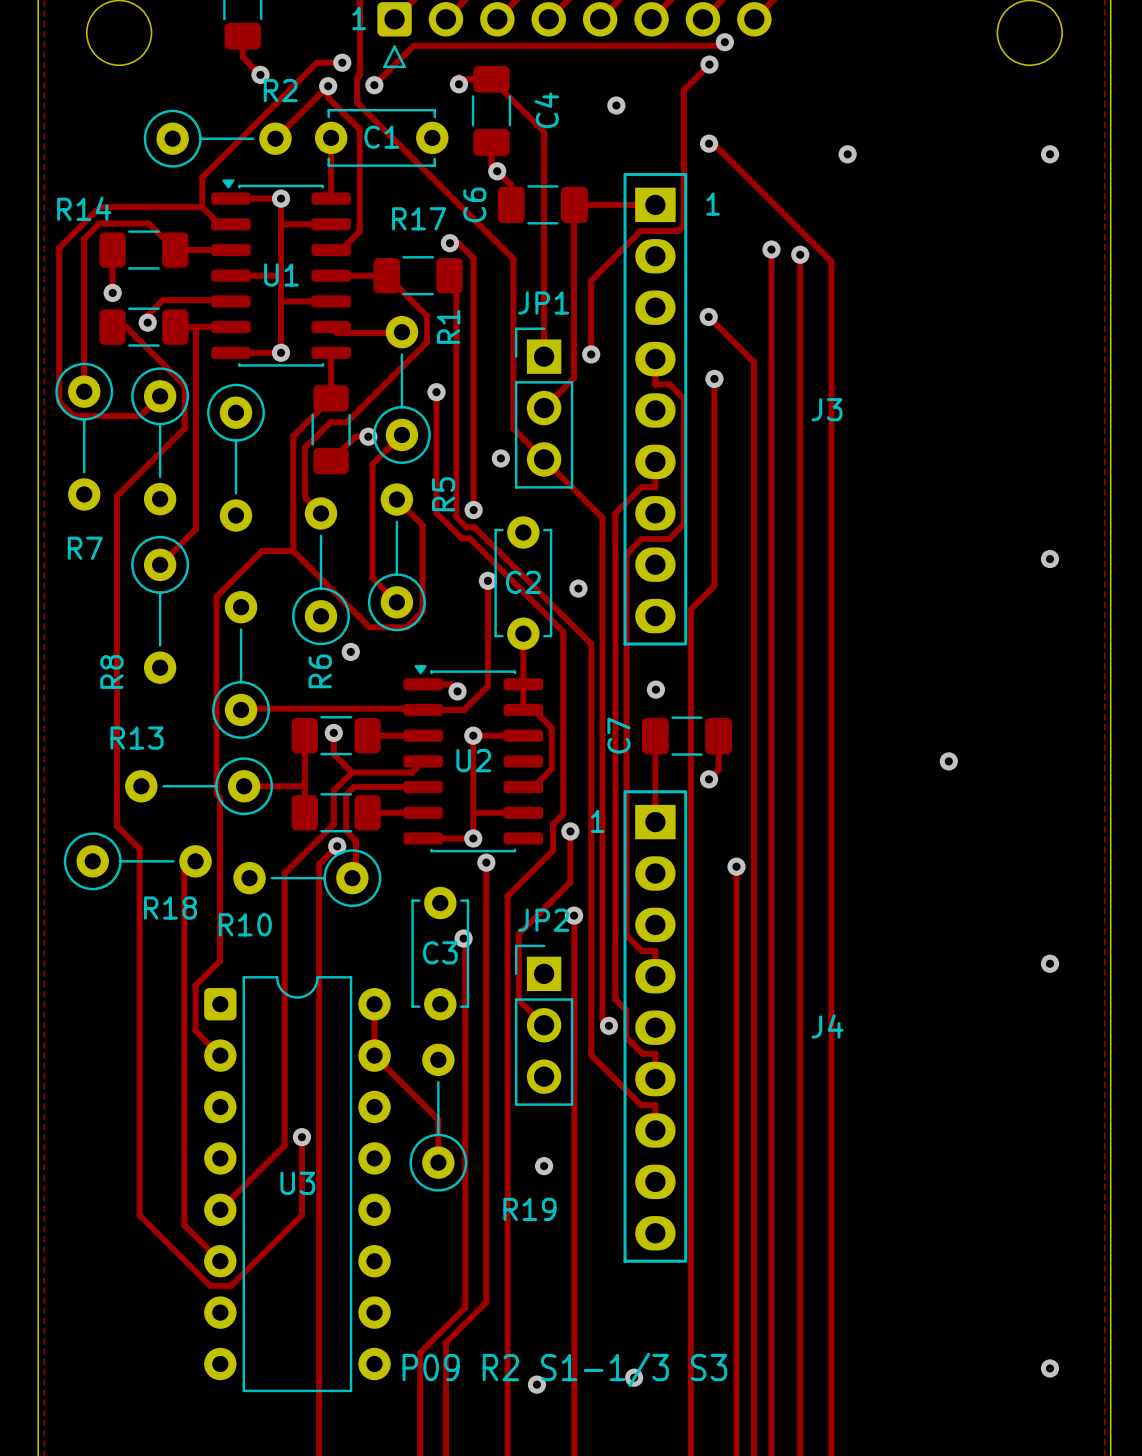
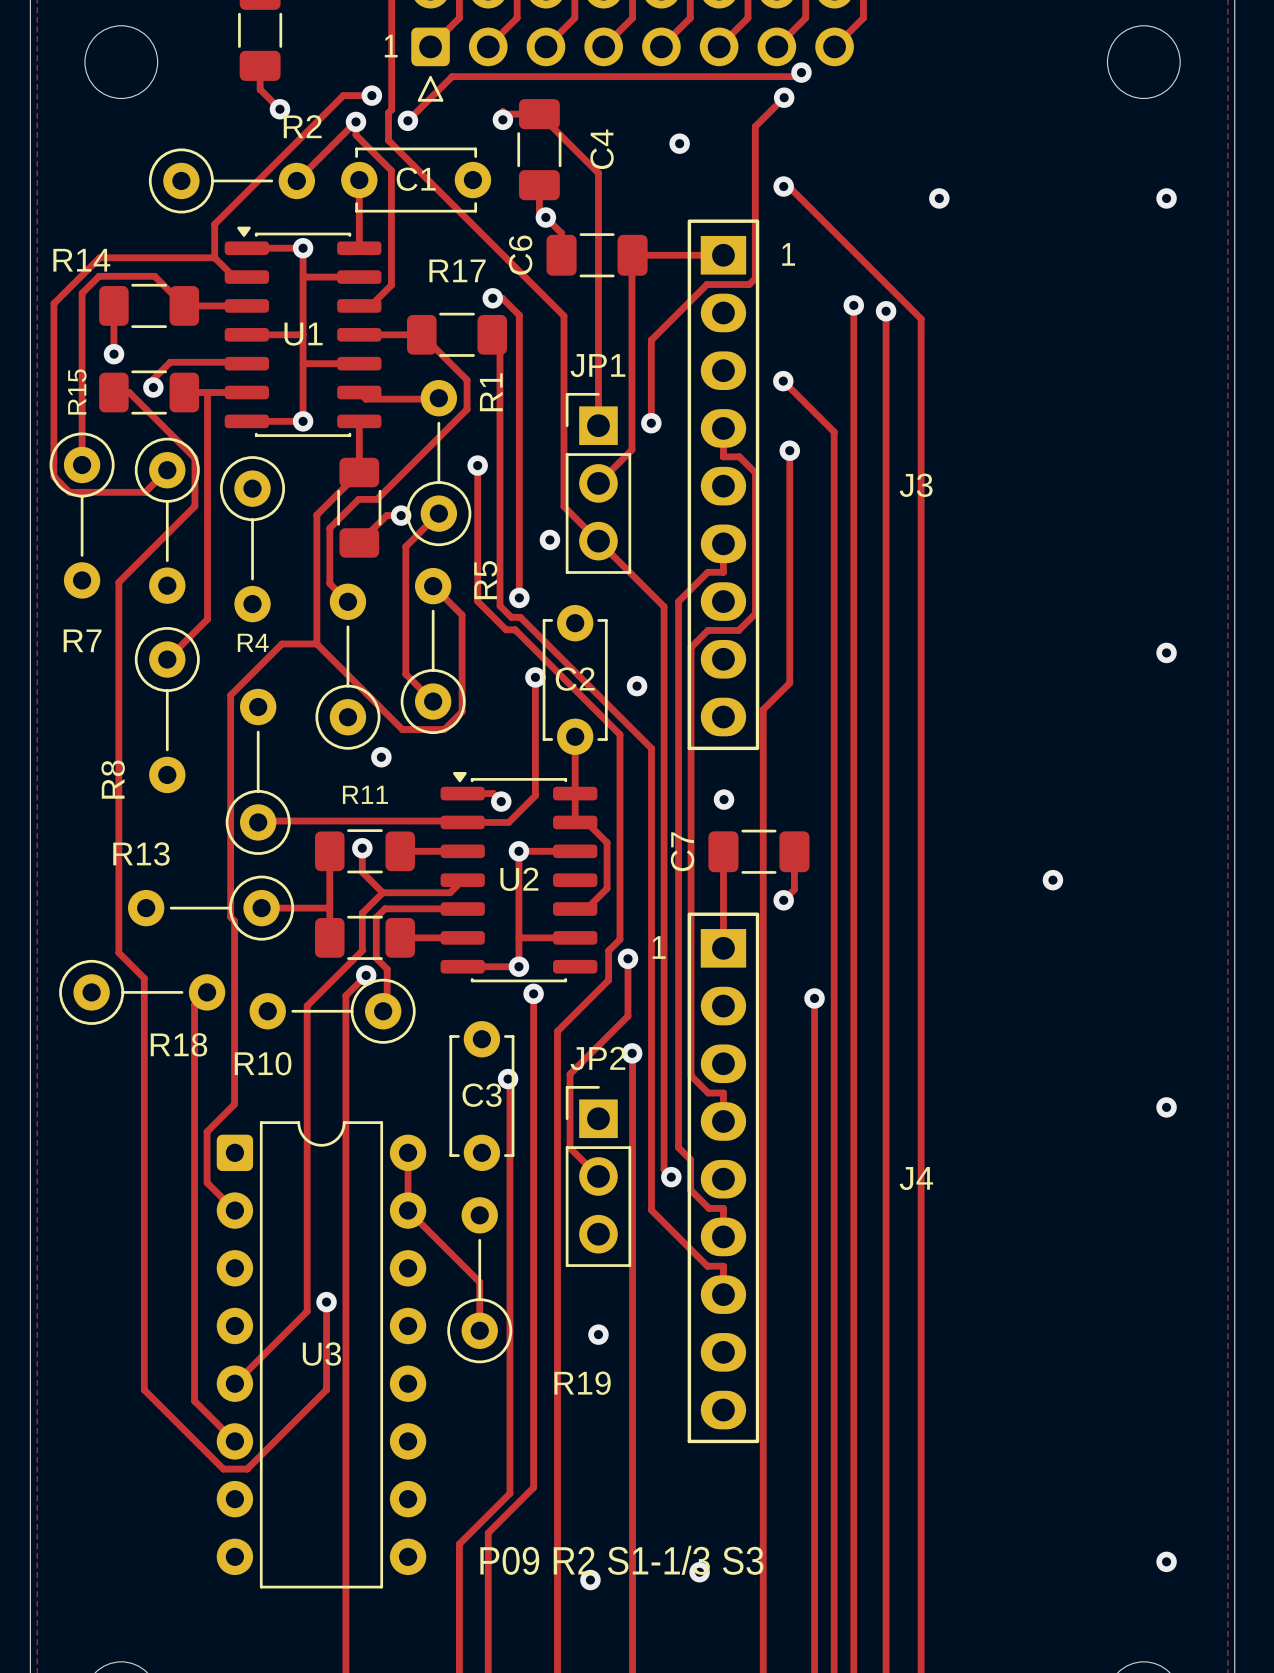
R15 name: none -> R15 (77, 391)
R4 name: none -> R4 (253, 642)
R6 name: R6 (320, 671) -> none
R11 name: none -> R11 (365, 794)

